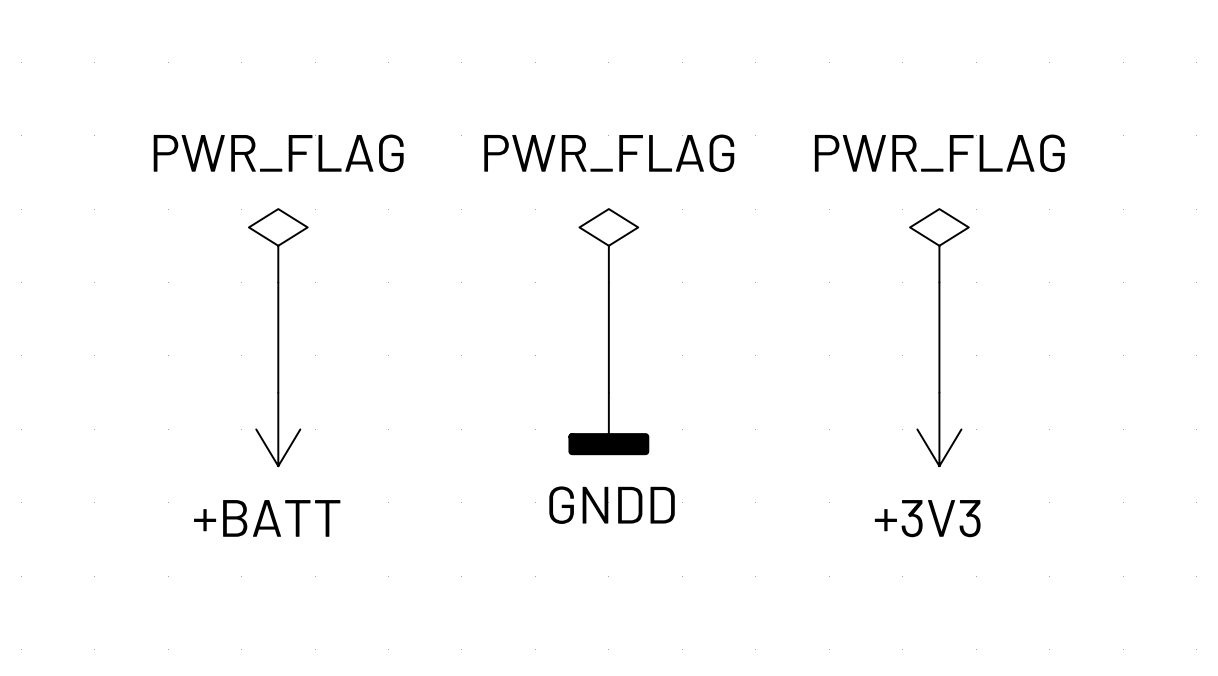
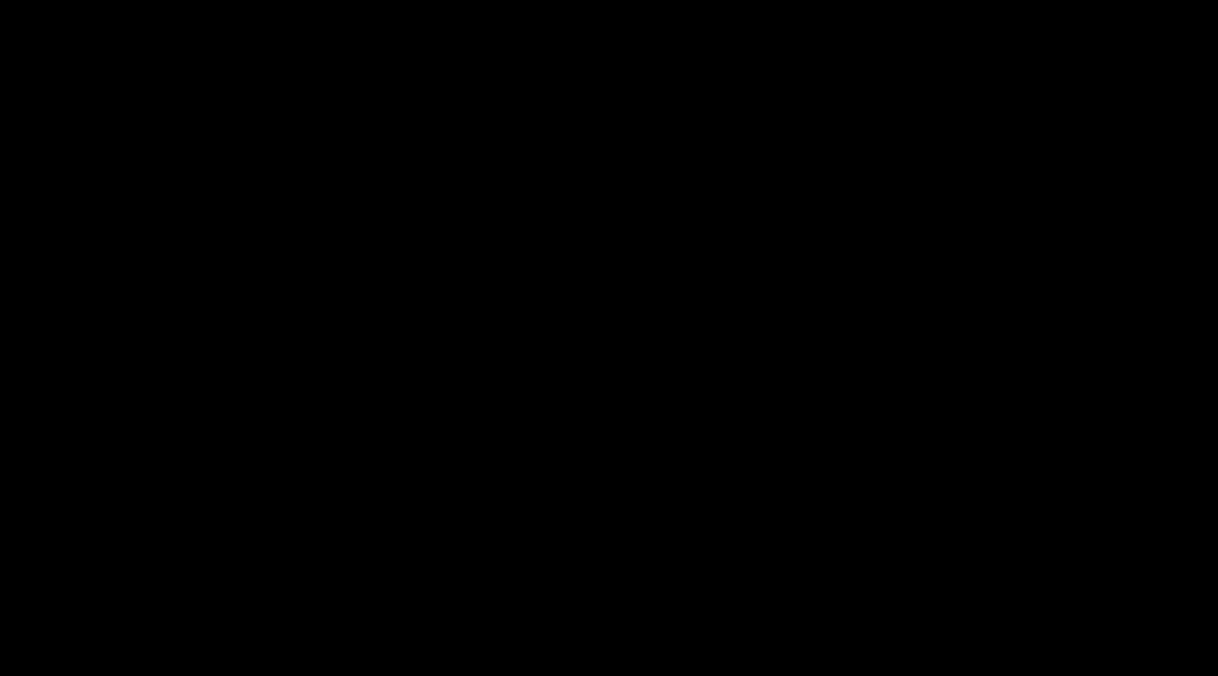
power symbol: PWR_FLAG (278, 245) -> none
power symbol: PWR_FLAG (608, 245) -> none
power symbol: PWR_FLAG (939, 245) -> none
wire: (278, 282) (278, 392) -> none
wire: (608, 282) (608, 392) -> none
wire: (939, 282) (939, 392) -> none
power symbol: GNDD (608, 423) -> none
power symbol: +BATT (278, 429) -> none
power symbol: +3V3 (939, 429) -> none

